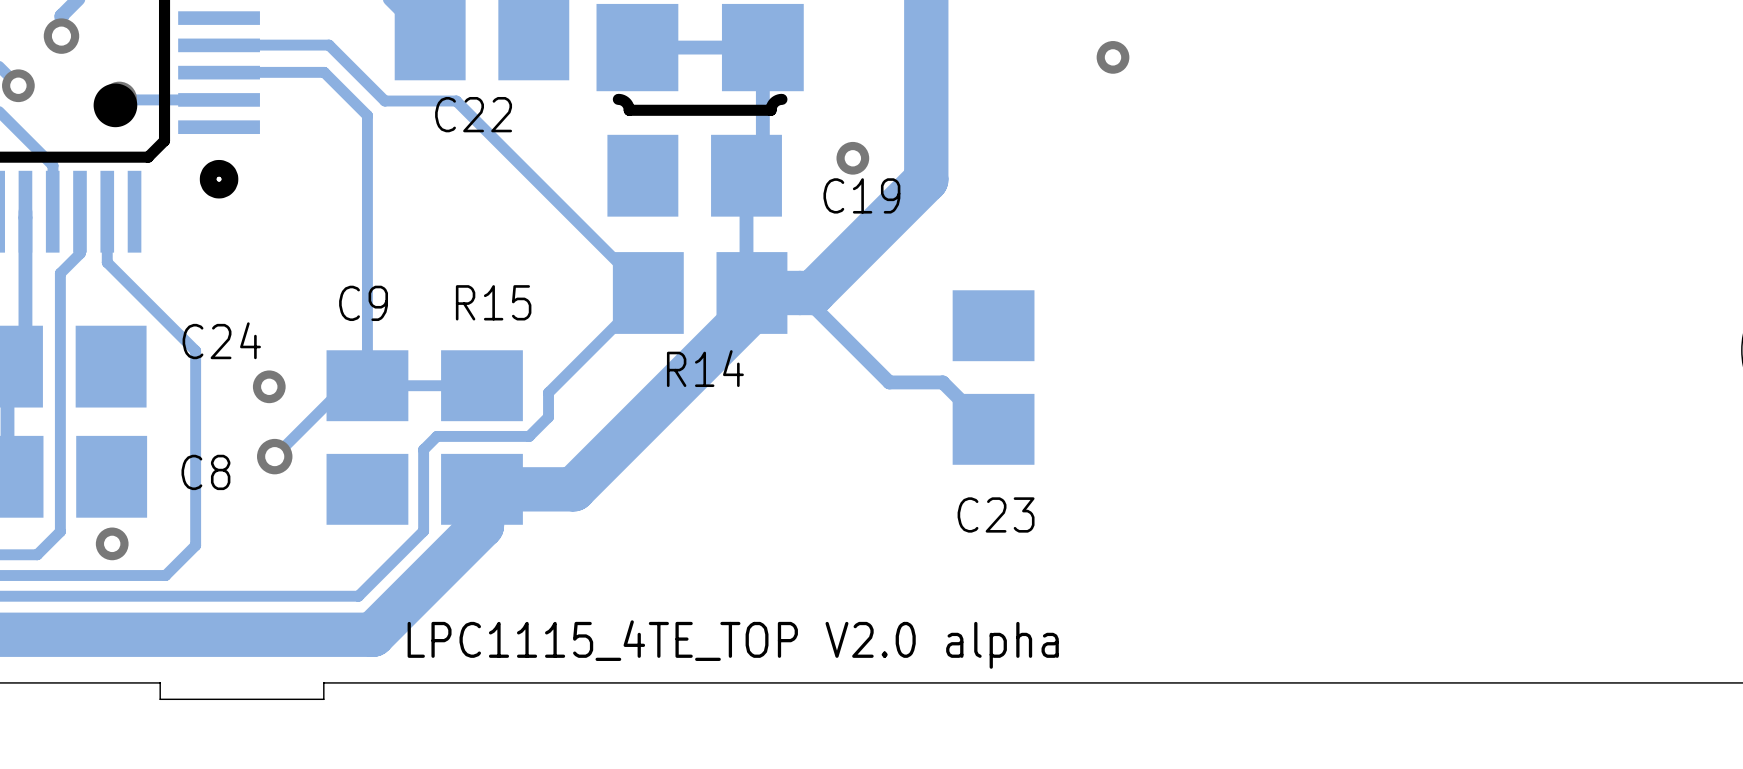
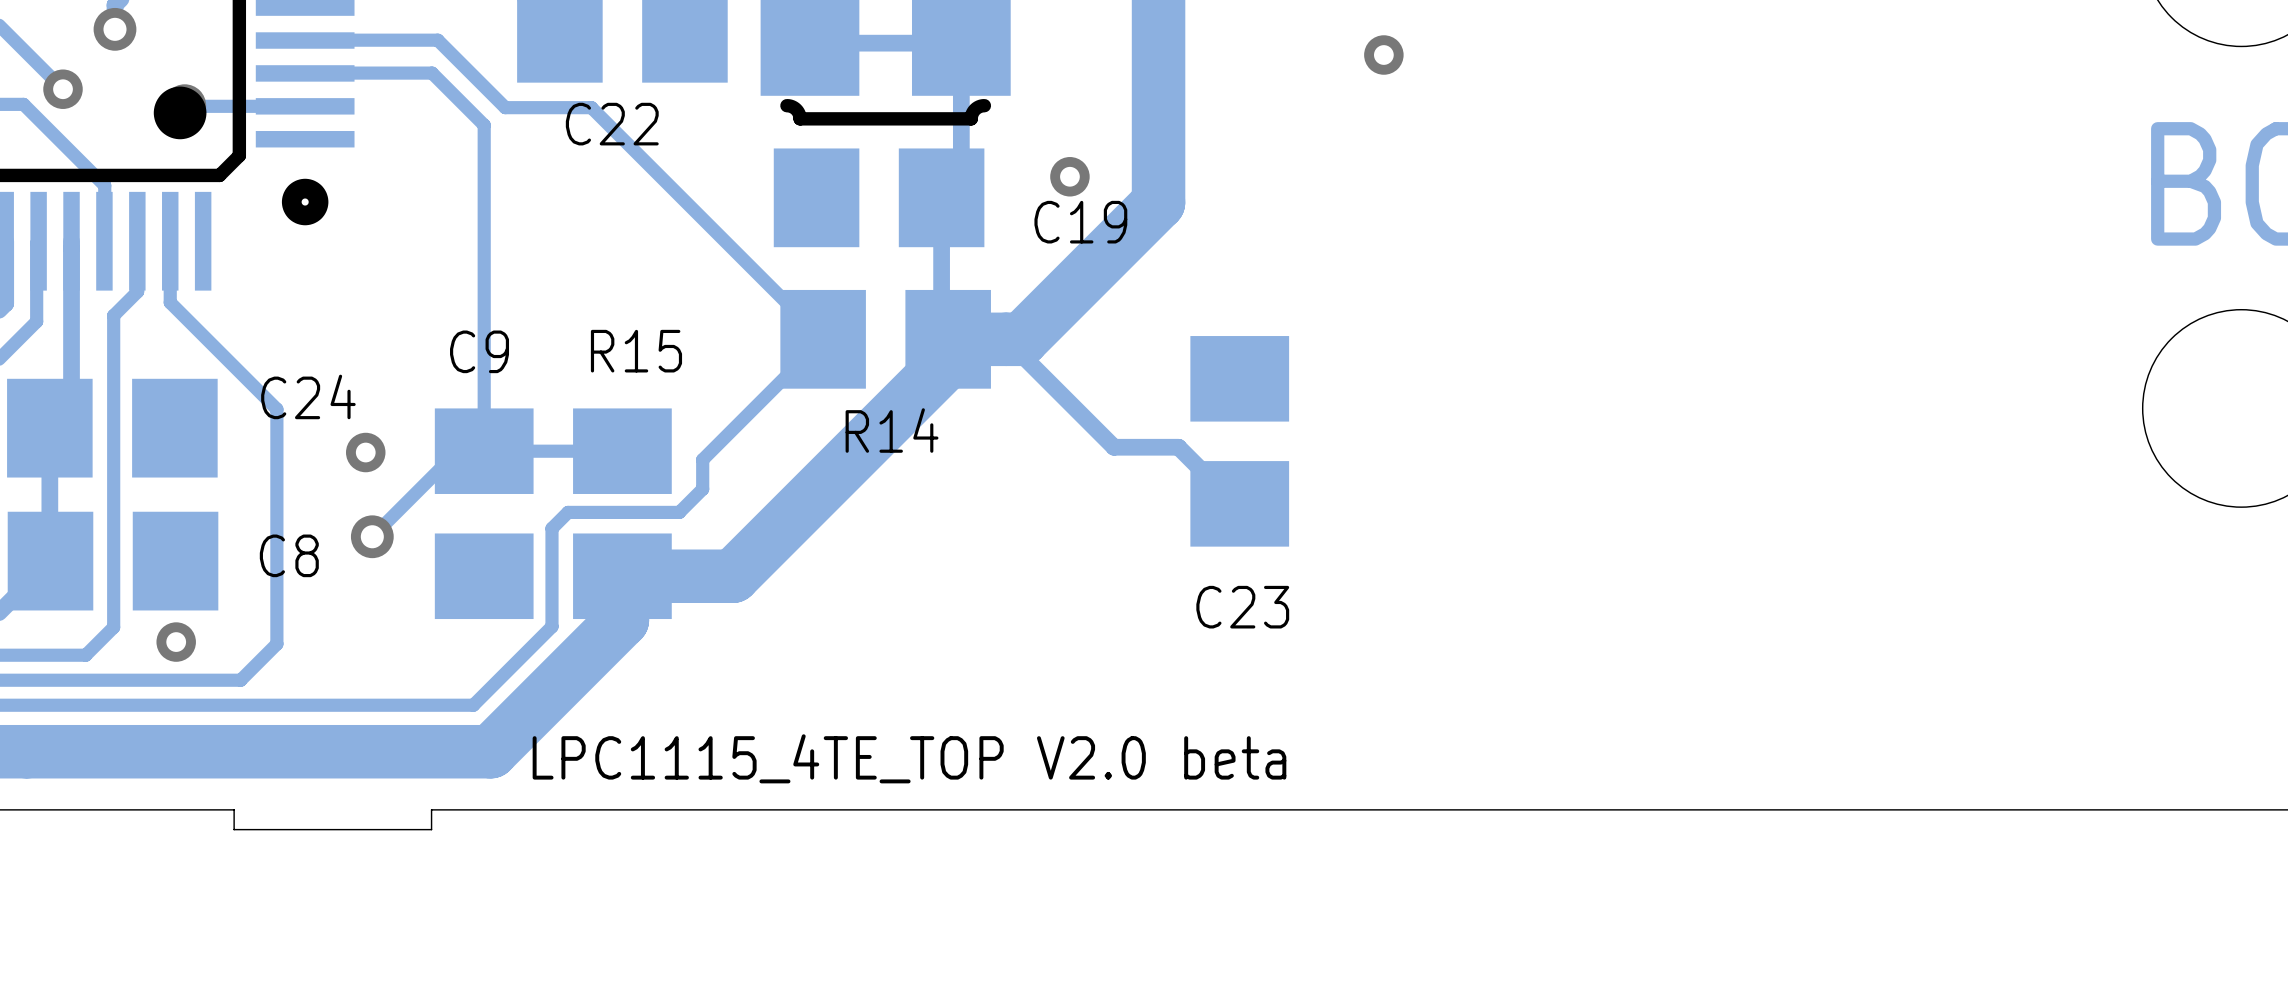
text: LPC1115_4TE_TOP V2.0 alpha (733, 644) -> LPC1115_4TE_TOP V2.0 beta (909, 758)

